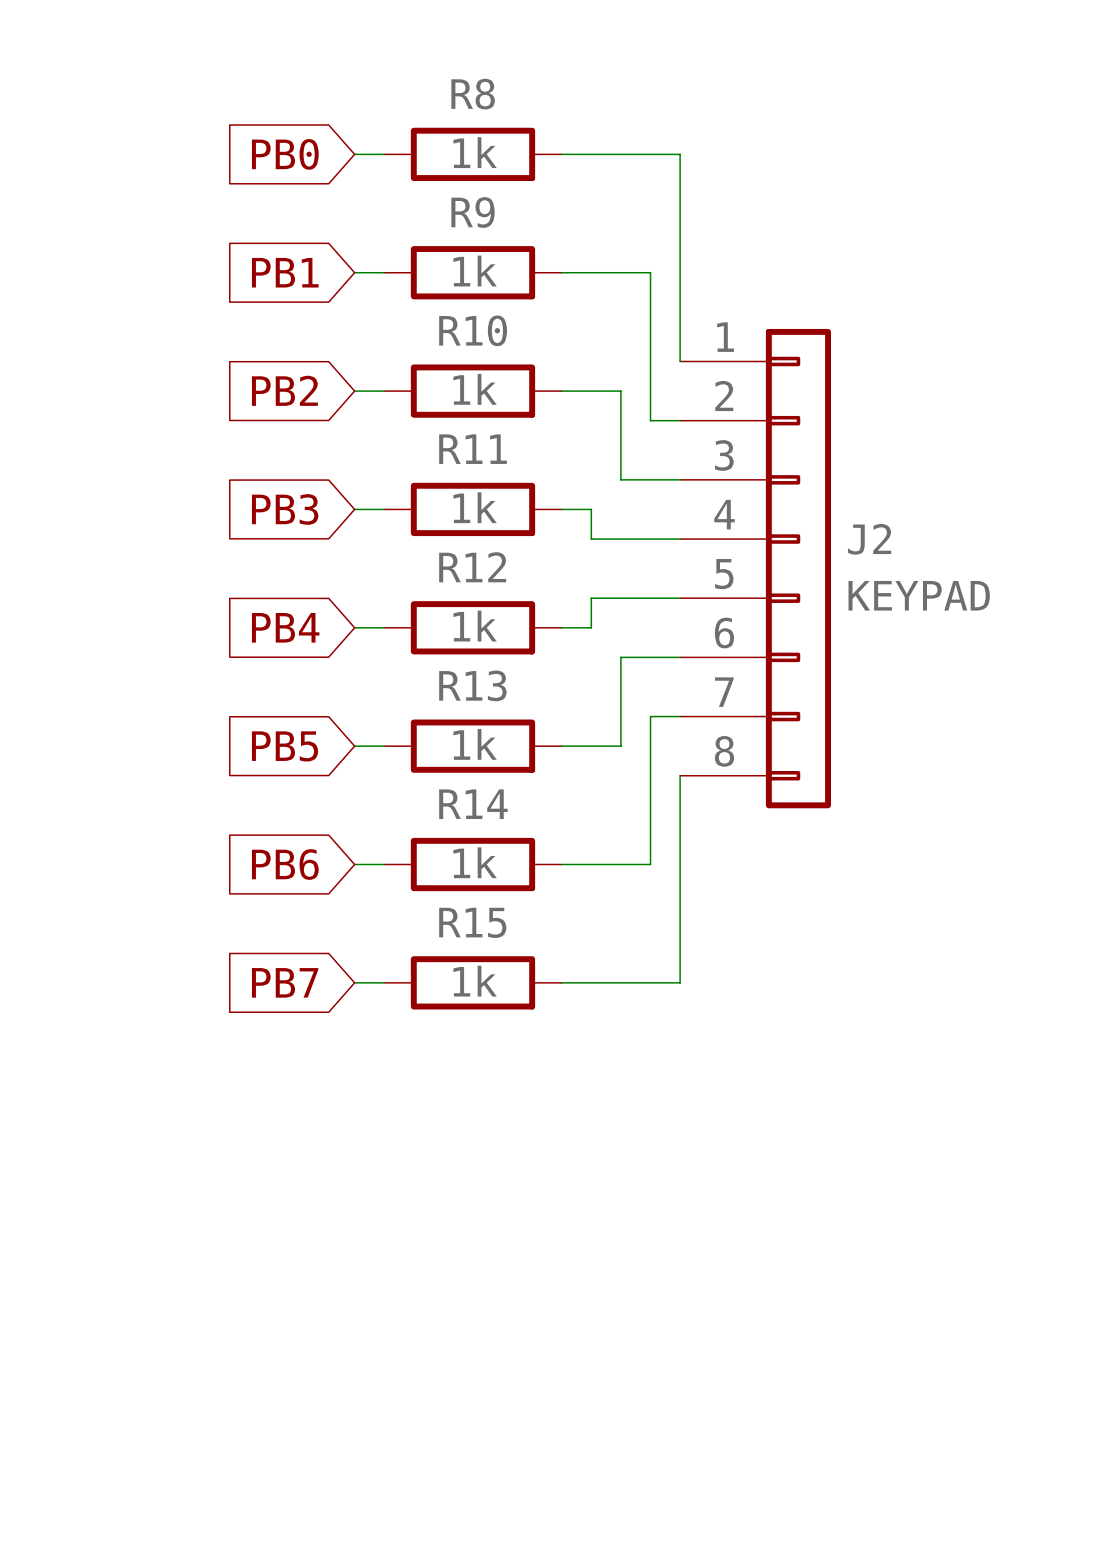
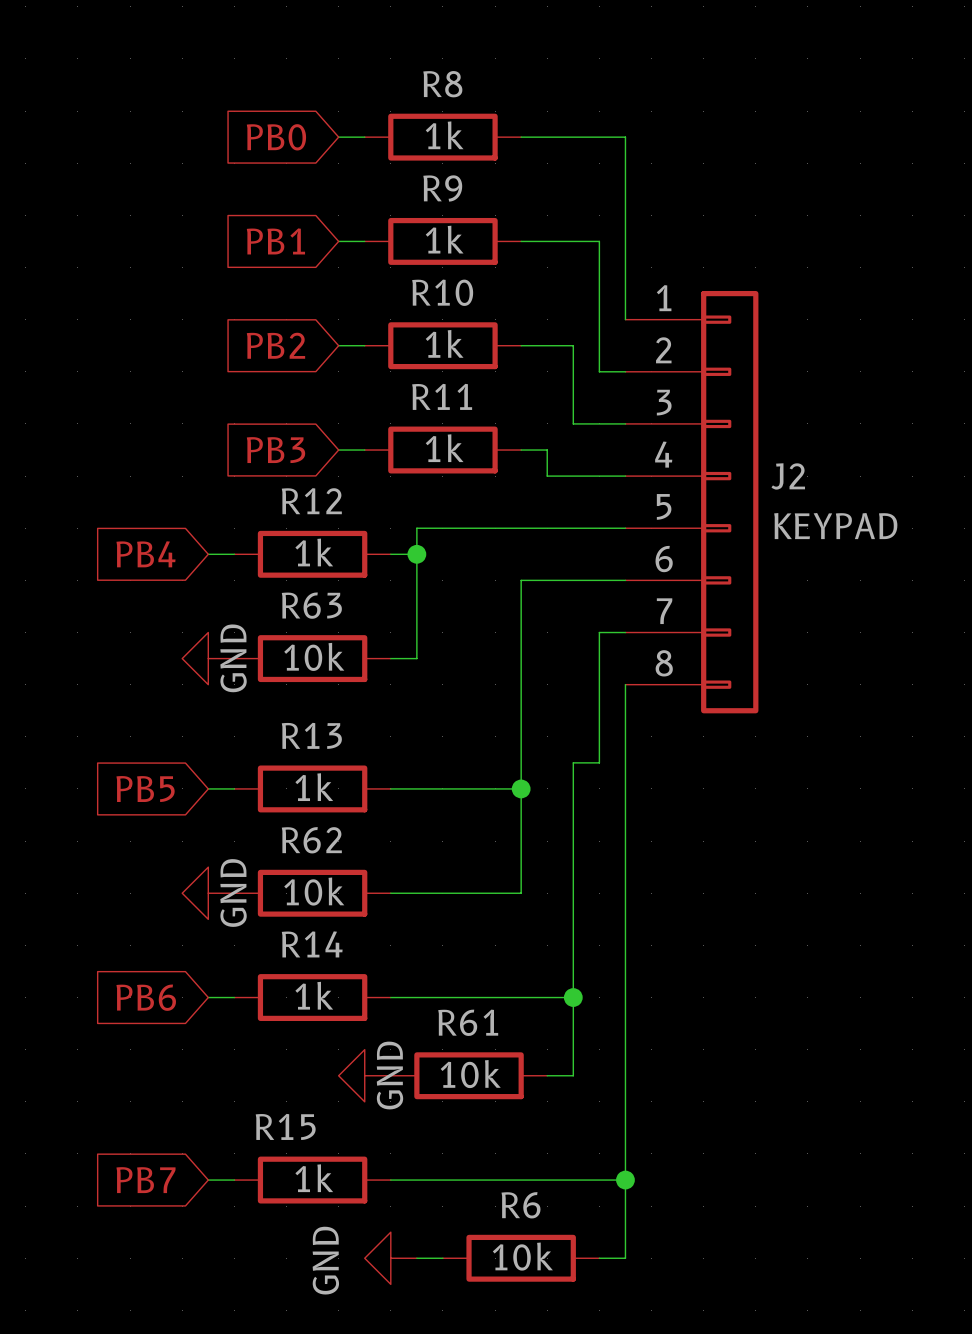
wire: (591, 598) (591, 627) (561, 627) -> (547, 528) (416, 528) (416, 658) (390, 658)
global label position: PB4 (285, 627) -> PB4 (145, 554)
wire: (354, 627) (384, 627) -> (390, 554) (416, 554)
junction: none -> (416, 554)
R12 position: (472, 627) -> (312, 554)
wire: (620, 657) (620, 746) (561, 746) -> (573, 580) (521, 580) (521, 893) (390, 893)
power symbol: none -> GND (208, 658)
global label position: PB5 (285, 746) -> PB5 (145, 789)
R63: none -> 10k (312, 658)
wire: (354, 746) (384, 746) -> (208, 788) (234, 788)
R13 position: (472, 746) -> (312, 788)
global label position: PB6 (285, 864) -> PB6 (146, 997)
wire: (354, 864) (384, 864) -> (208, 554) (234, 554)
R14 position: (472, 864) -> (312, 997)
wire: (561, 864) (620, 864) -> (547, 1075) (573, 1075) (573, 762)
wire: none -> (390, 788) (521, 788)
junction: none -> (521, 788)
R15 name position: R15 (472, 922) -> R15 (285, 1126)
global label position: PB7 (285, 982) -> PB7 (145, 1180)
wire: (354, 982) (384, 982) -> (208, 997) (234, 997)
R15 position: (472, 982) -> (312, 1180)
wire: (561, 982) (680, 982) -> (599, 1258) (625, 1258) (625, 867)
power symbol: none -> GND (208, 893)
R62: none -> 10k (312, 893)
wire: none -> (390, 997) (573, 997)
junction: none -> (573, 997)
power symbol: none -> GND (364, 1075)
R61: none -> 10k (469, 1075)
wire: none -> (208, 1180) (234, 1180)
wire: none -> (390, 1180) (625, 1180)
junction: none -> (625, 1180)
power symbol: none -> GND (390, 1258)
wire: none -> (416, 1258) (442, 1258)
R6: none -> 10k (521, 1258)

